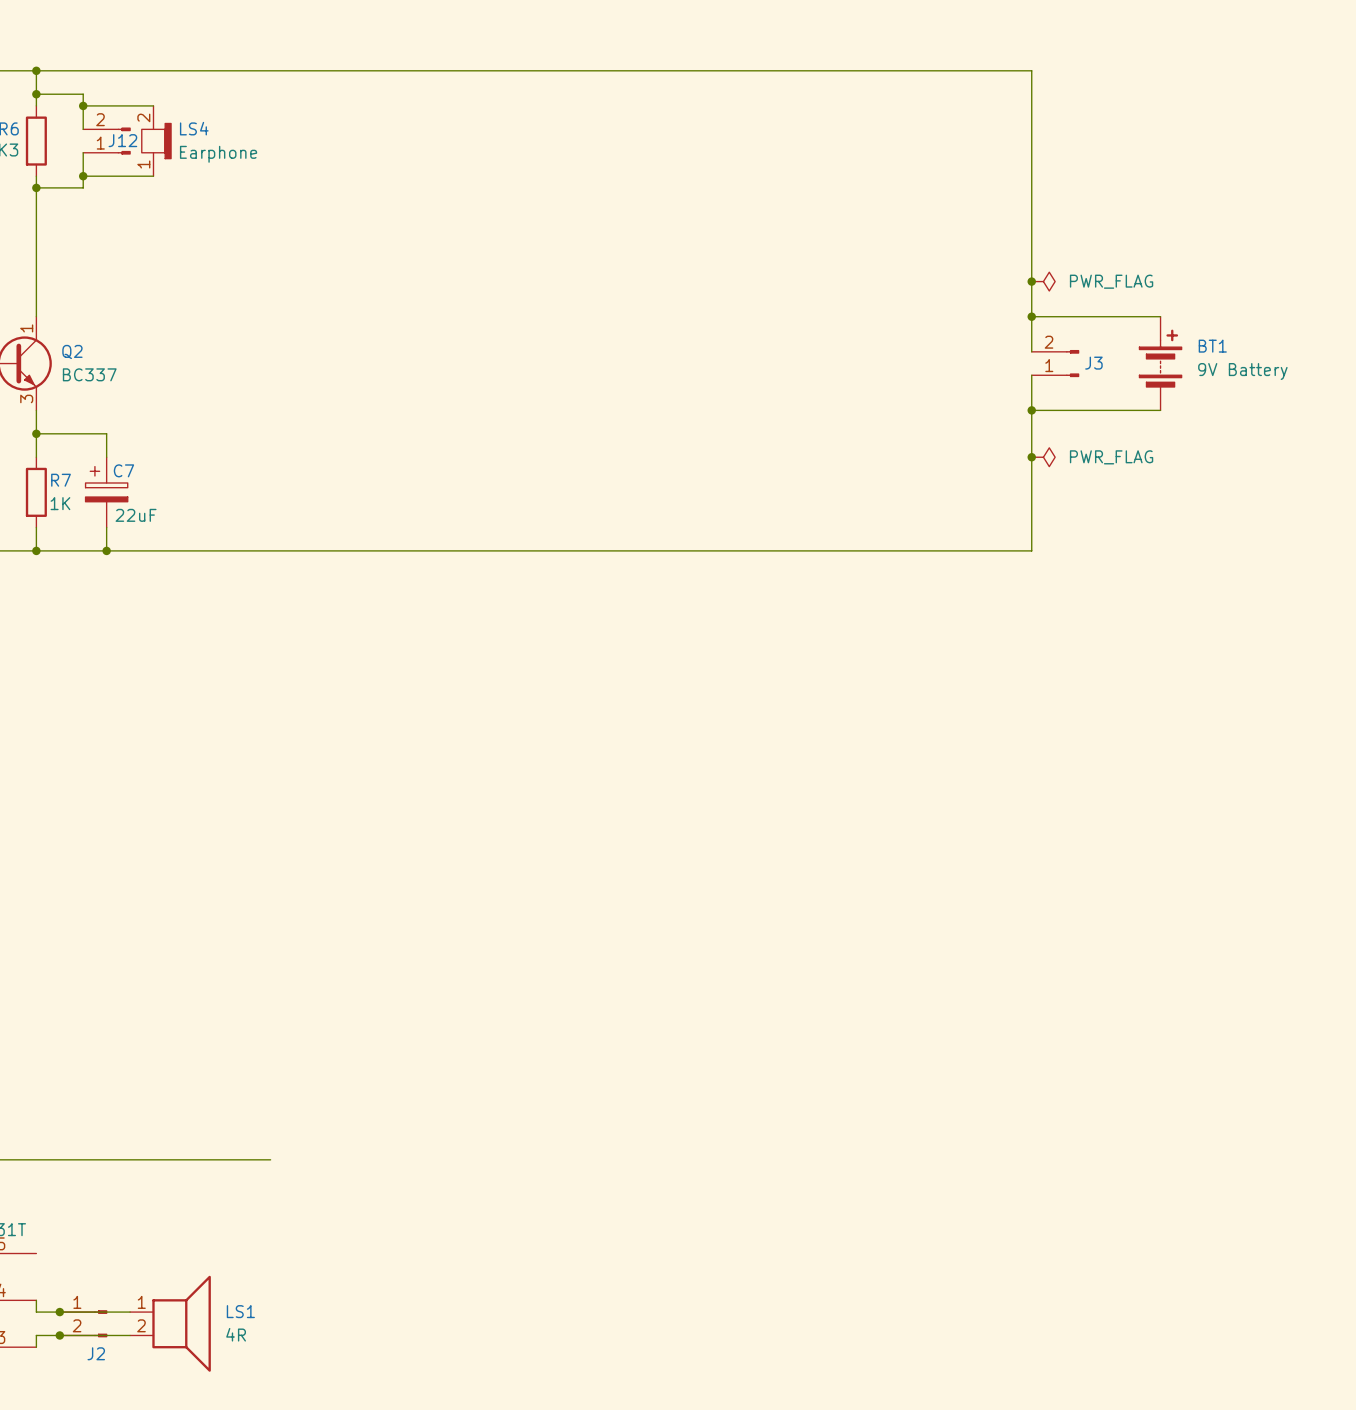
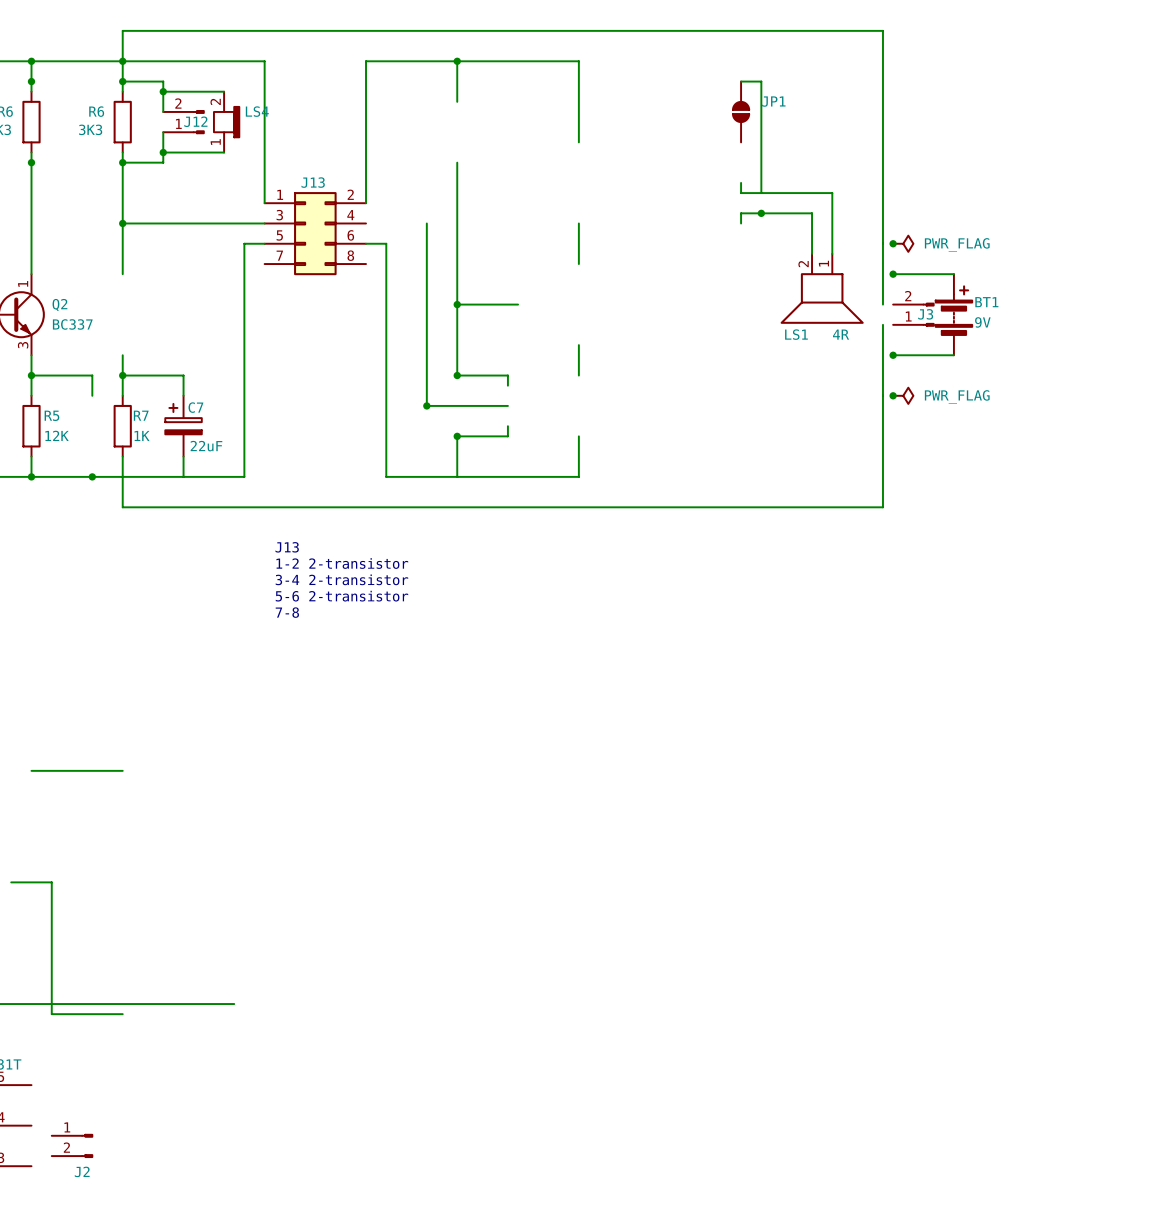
junction: none -> (122, 61)
wire: (305, 70) (422, 70) -> (264, 61) (264, 203)
wire: none -> (366, 61) (366, 203)
wire: none -> (457, 61) (457, 101)
junction: none -> (457, 61)
wire: (668, 70) (1031, 70) (1031, 351) -> (578, 61) (578, 142)
wire: (36, 94) (83, 94) (83, 129) -> (122, 81) (163, 81) (163, 111)
junction: none -> (122, 81)
wire: none -> (741, 81) (761, 81) (761, 193)
wire: (83, 105) (153, 105) -> (163, 91) (224, 91)
junction: (83, 105) -> none
wire: none -> (122, 91) (122, 30) (882, 30) (882, 304)
junction: none -> (163, 91)
JP1: none -> (741, 111)
J12 position: (106, 141) -> (183, 122)
R6: none -> 3K3 (122, 122)
LS4 position: (156, 141) -> (226, 122)
wire: (83, 152) (83, 187) (36, 187) -> (163, 132) (163, 162) (122, 162)
LS4 value: Earphone (218, 154) -> none
wire: (83, 176) (153, 176) -> (163, 152) (224, 152)
junction: (83, 176) -> none
wire: none -> (122, 152) (122, 274)
junction: none -> (163, 152)
junction: none -> (122, 162)
wire: none -> (457, 162) (457, 375) (507, 375) (507, 385)
wire: none -> (741, 182) (741, 193) (832, 193) (832, 253)
junction: none -> (761, 213)
wire: none -> (122, 223) (264, 223)
junction: none -> (122, 223)
wire: none -> (426, 223) (426, 405) (507, 405)
wire: none -> (578, 223) (578, 264)
wire: none -> (741, 223) (741, 213) (812, 213) (812, 253)
J13: none -> (315, 233)
wire: none -> (366, 243) (386, 243) (386, 476)
wire: (1101, 316) (1160, 316) -> none
BT1 name position: BT1 (1212, 346) -> BT1 (986, 302)
wire: none -> (457, 304) (518, 304)
junction: none -> (457, 304)
J3 name position: J3 (1093, 363) -> J3 (925, 314)
BT1 position: (1160, 363) -> (953, 314)
BT1 value: 9V Battery (1242, 371) -> 9V (982, 322)
wire: none -> (882, 324) (882, 507) (122, 507) (122, 456)
wire: (1031, 375) (1031, 550) (668, 550) -> (578, 436) (578, 476)
wire: none -> (578, 345) (578, 375)
wire: none -> (122, 355) (122, 395)
wire: (1101, 410) (1160, 410) -> none
wire: none -> (122, 375) (183, 375) (183, 395)
junction: none -> (122, 375)
junction: none -> (457, 375)
junction: none -> (426, 405)
R7 name: R7 (61, 480) -> R5 (51, 415)
C7 position: (106, 492) -> (183, 426)
R7: none -> 1K (122, 426)
wire: none -> (507, 426) (507, 436) (457, 436) (457, 476)
R7 value: 1K (60, 503) -> 12K (57, 435)
junction: none -> (457, 436)
wire: (106, 527) (106, 550) -> (183, 456) (183, 476)
wire: (282, 550) (446, 550) -> (244, 476) (244, 243) (264, 243)
text: none -> J13 (287, 547)
text: none -> 1-2 2-transistor (342, 563)
text: none -> 3-4 2-transistor (341, 579)
text: none -> 5-6 2-transistor (341, 596)
text: none -> 7-8 (287, 612)
wire: none -> (31, 770) (122, 770)
wire: none -> (11, 882) (51, 882) (51, 1014) (122, 1014)
wire: (36, 1300) (36, 1312) (130, 1312) -> none
LS1 name position: LS1 (240, 1311) -> LS1 (796, 334)
junction: (59, 1312) -> none
LS1 position: (170, 1323) -> (822, 288)
LS1 rotation: 0° (181, 1323) -> 90° clockwise (822, 298)
LS1 value position: 4R (236, 1334) -> 4R (841, 334)
junction: (59, 1335) -> none
wire: (130, 1335) (36, 1335) (36, 1347) -> none

